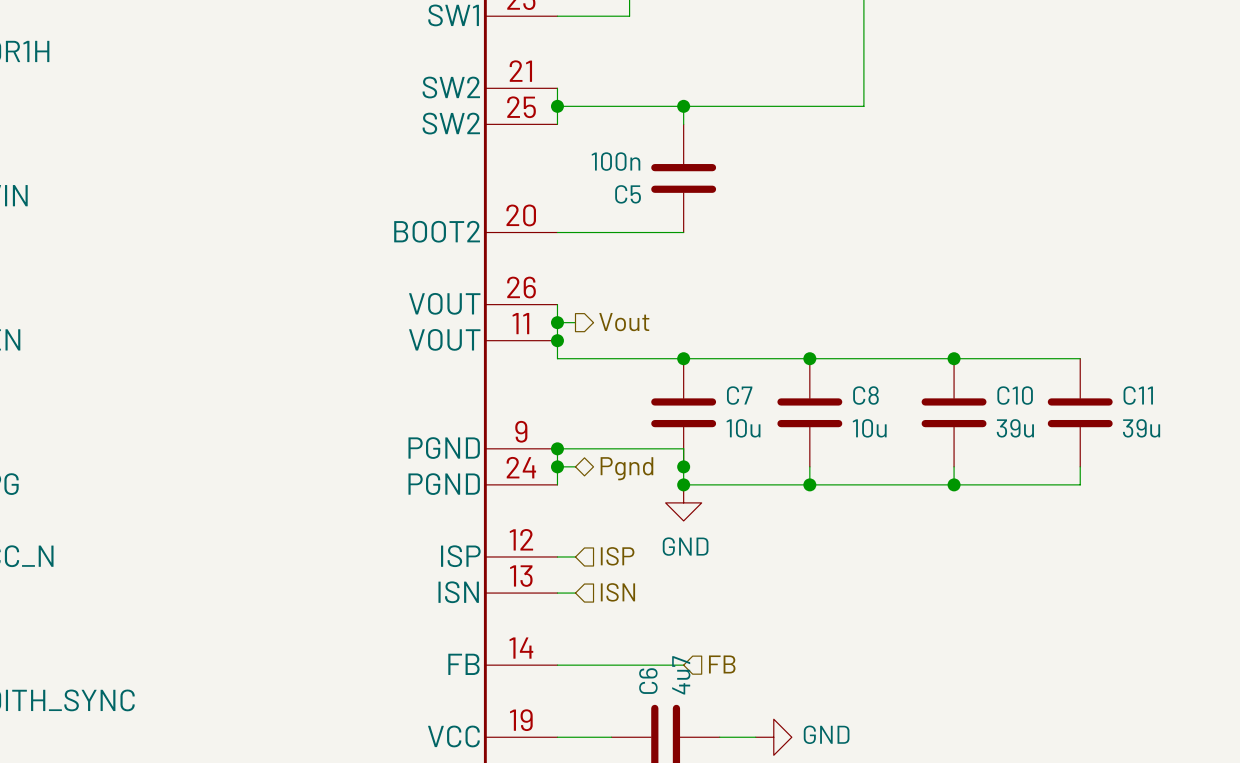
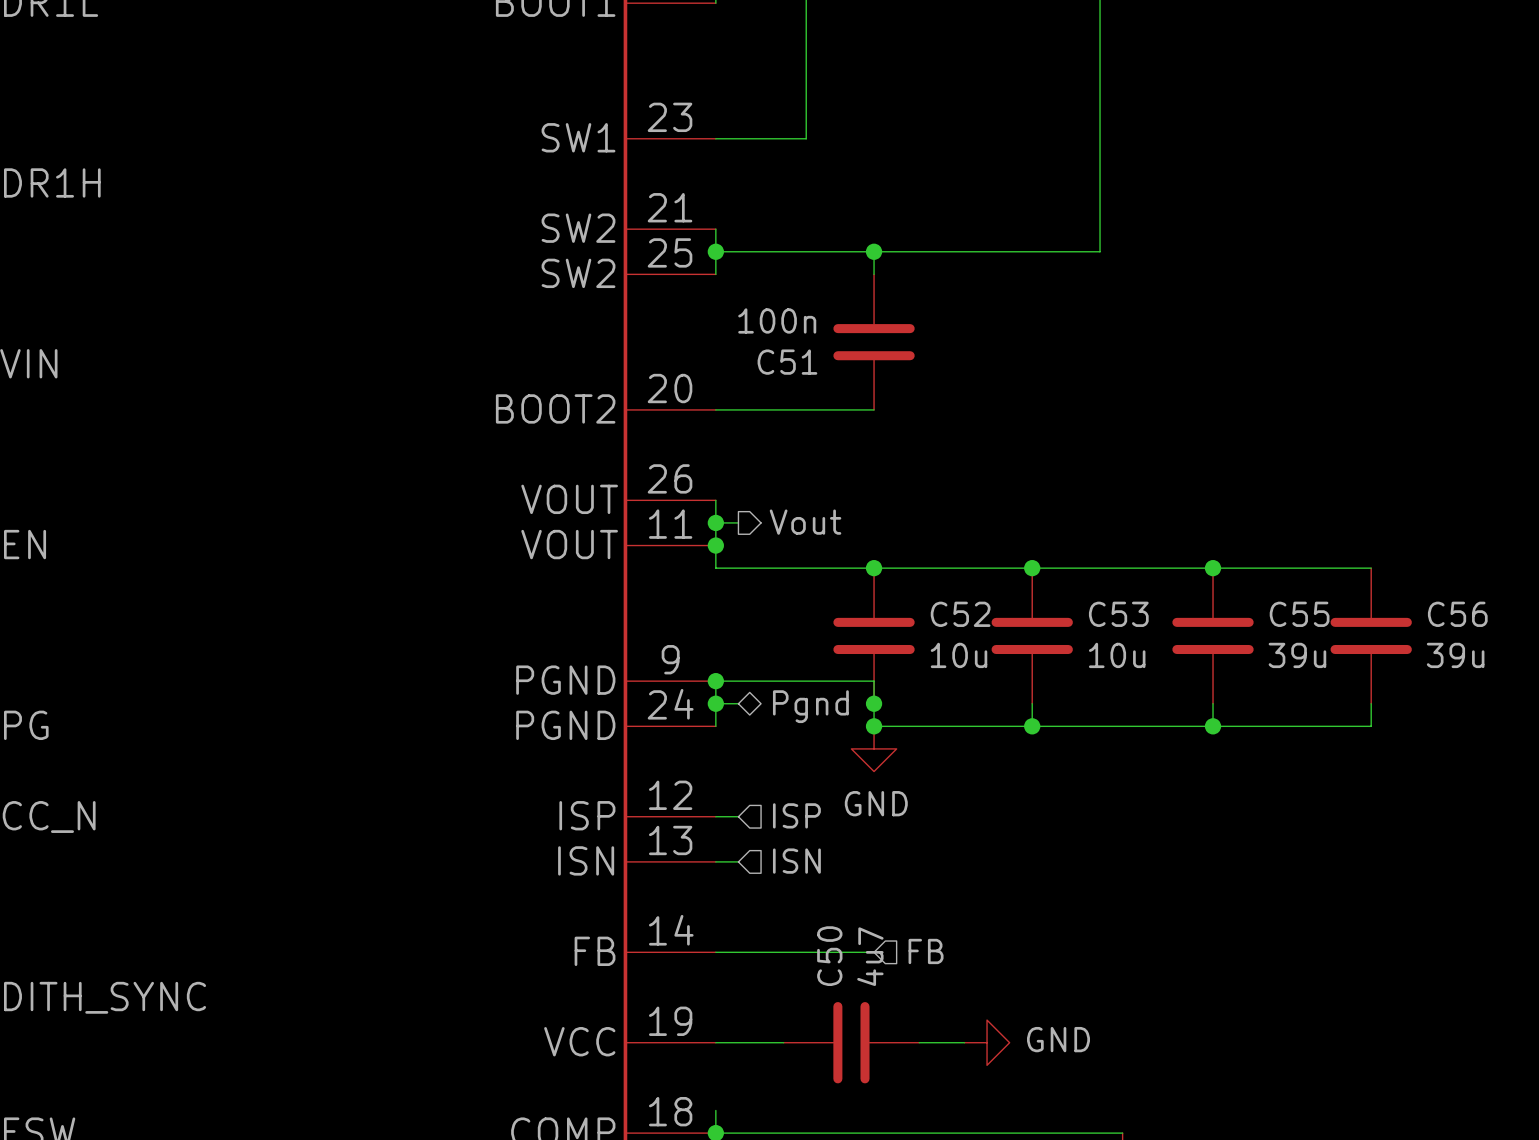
C5 name: C5 (628, 194) -> C51 (787, 362)
C7 name: C7 (739, 395) -> C52 (960, 614)
C8 name: C8 (865, 395) -> C53 (1118, 614)
C10 name: C10 (1015, 395) -> C55 (1299, 614)
C11 name: C11 (1138, 395) -> C56 (1457, 614)
C6 name: C6 (648, 681) -> C50 (829, 956)

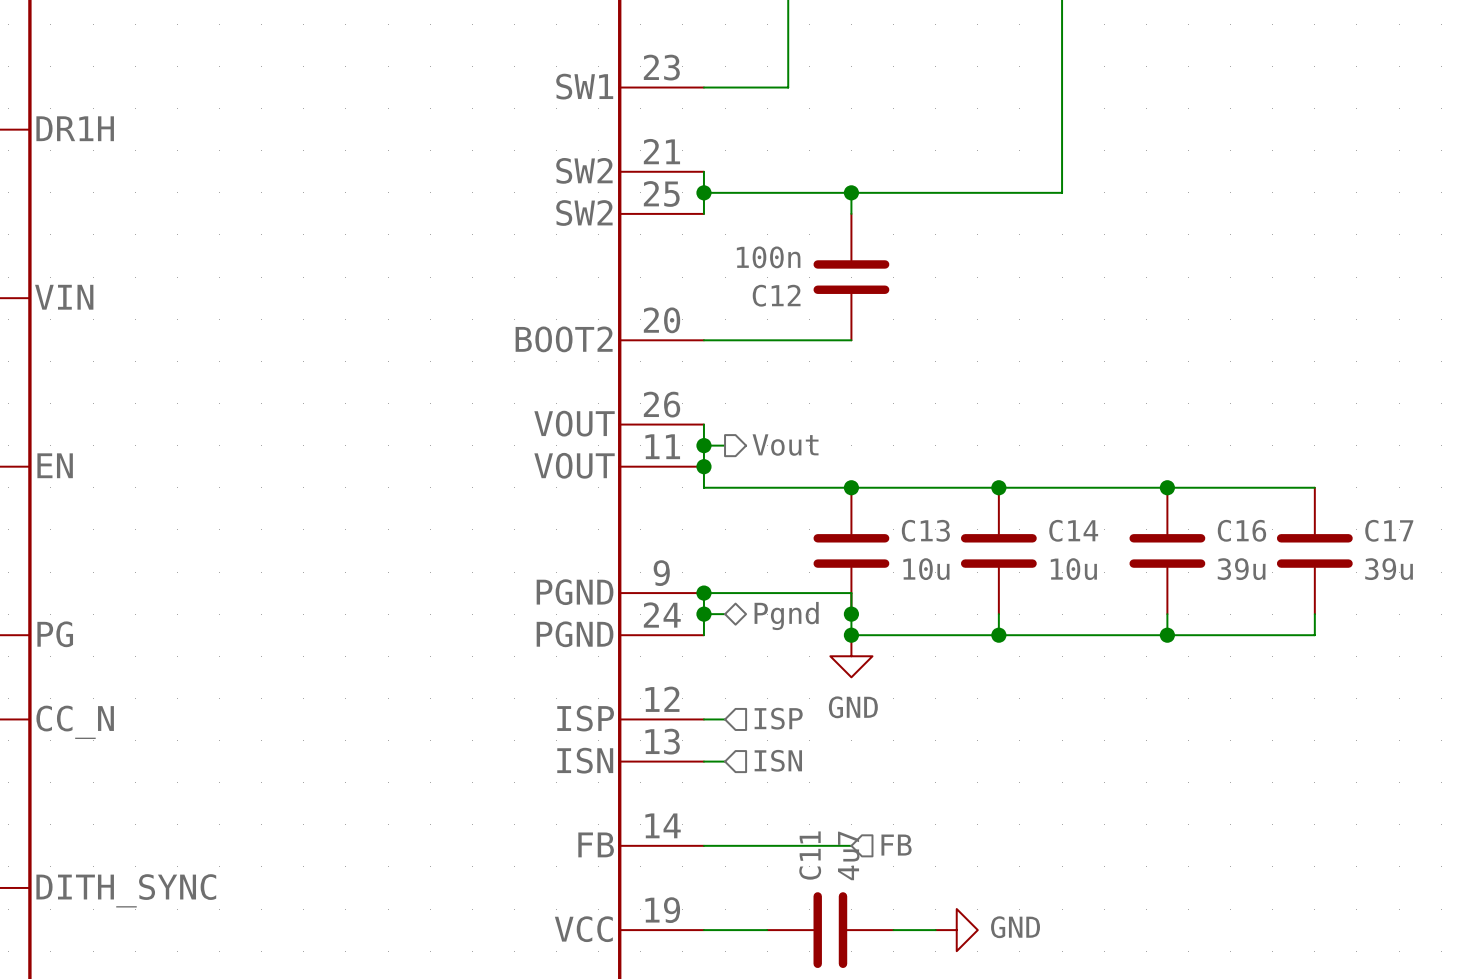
C51 name: C51 (787, 362) -> C12 (776, 295)
C52 name: C52 (960, 614) -> C13 (925, 530)
C53 name: C53 (1118, 614) -> C14 (1073, 530)
C55 name: C55 (1299, 614) -> C16 (1241, 530)
C56 name: C56 (1457, 614) -> C17 (1389, 530)
C50 name: C50 (829, 956) -> C11 (810, 855)

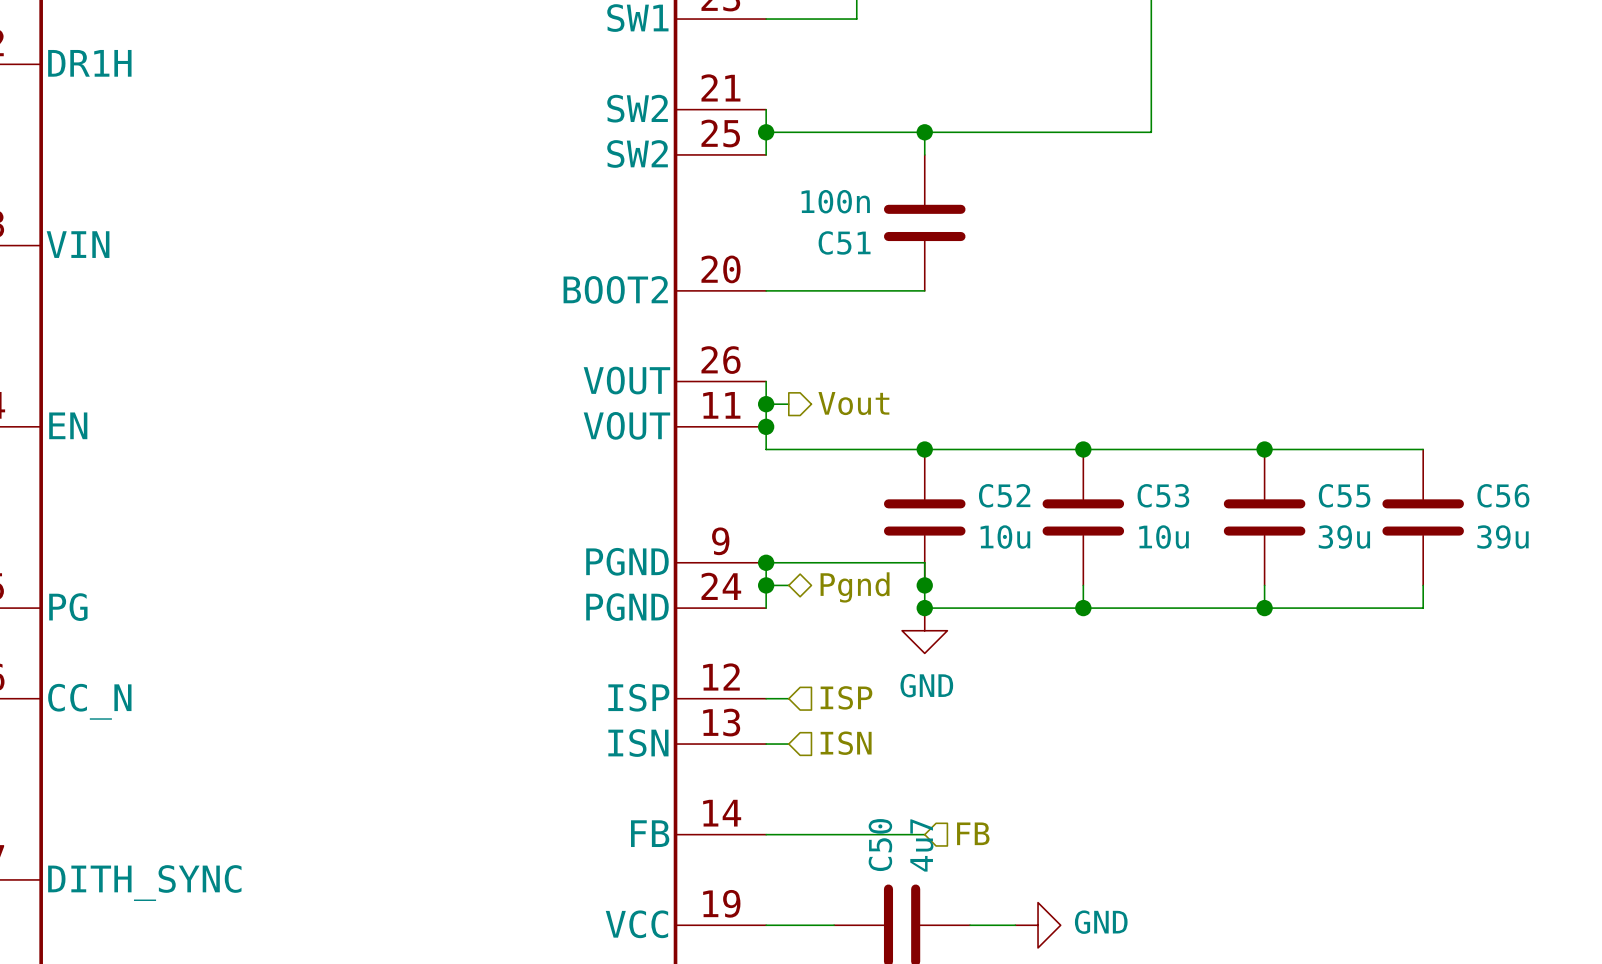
C12 name: C12 (776, 295) -> C51 (844, 242)
C13 name: C13 (925, 530) -> C52 (1004, 495)
C14 name: C14 (1073, 530) -> C53 (1163, 495)
C16 name: C16 (1241, 530) -> C55 (1344, 495)
C17 name: C17 (1389, 530) -> C56 (1503, 495)
C11 name: C11 (810, 855) -> C50 (880, 845)

